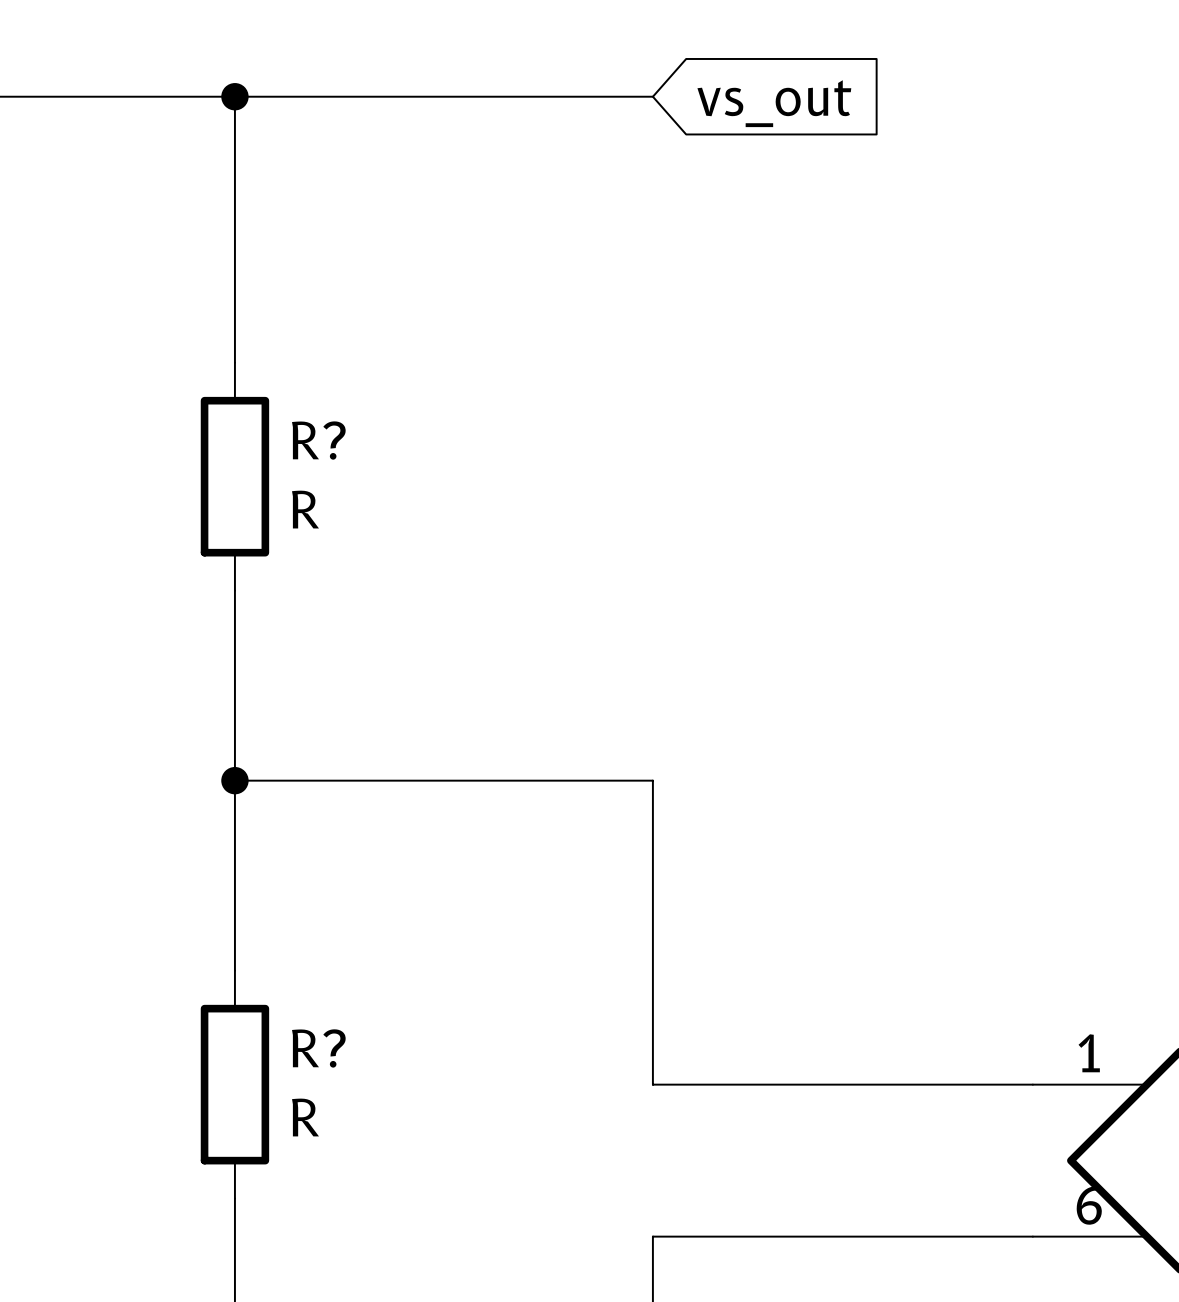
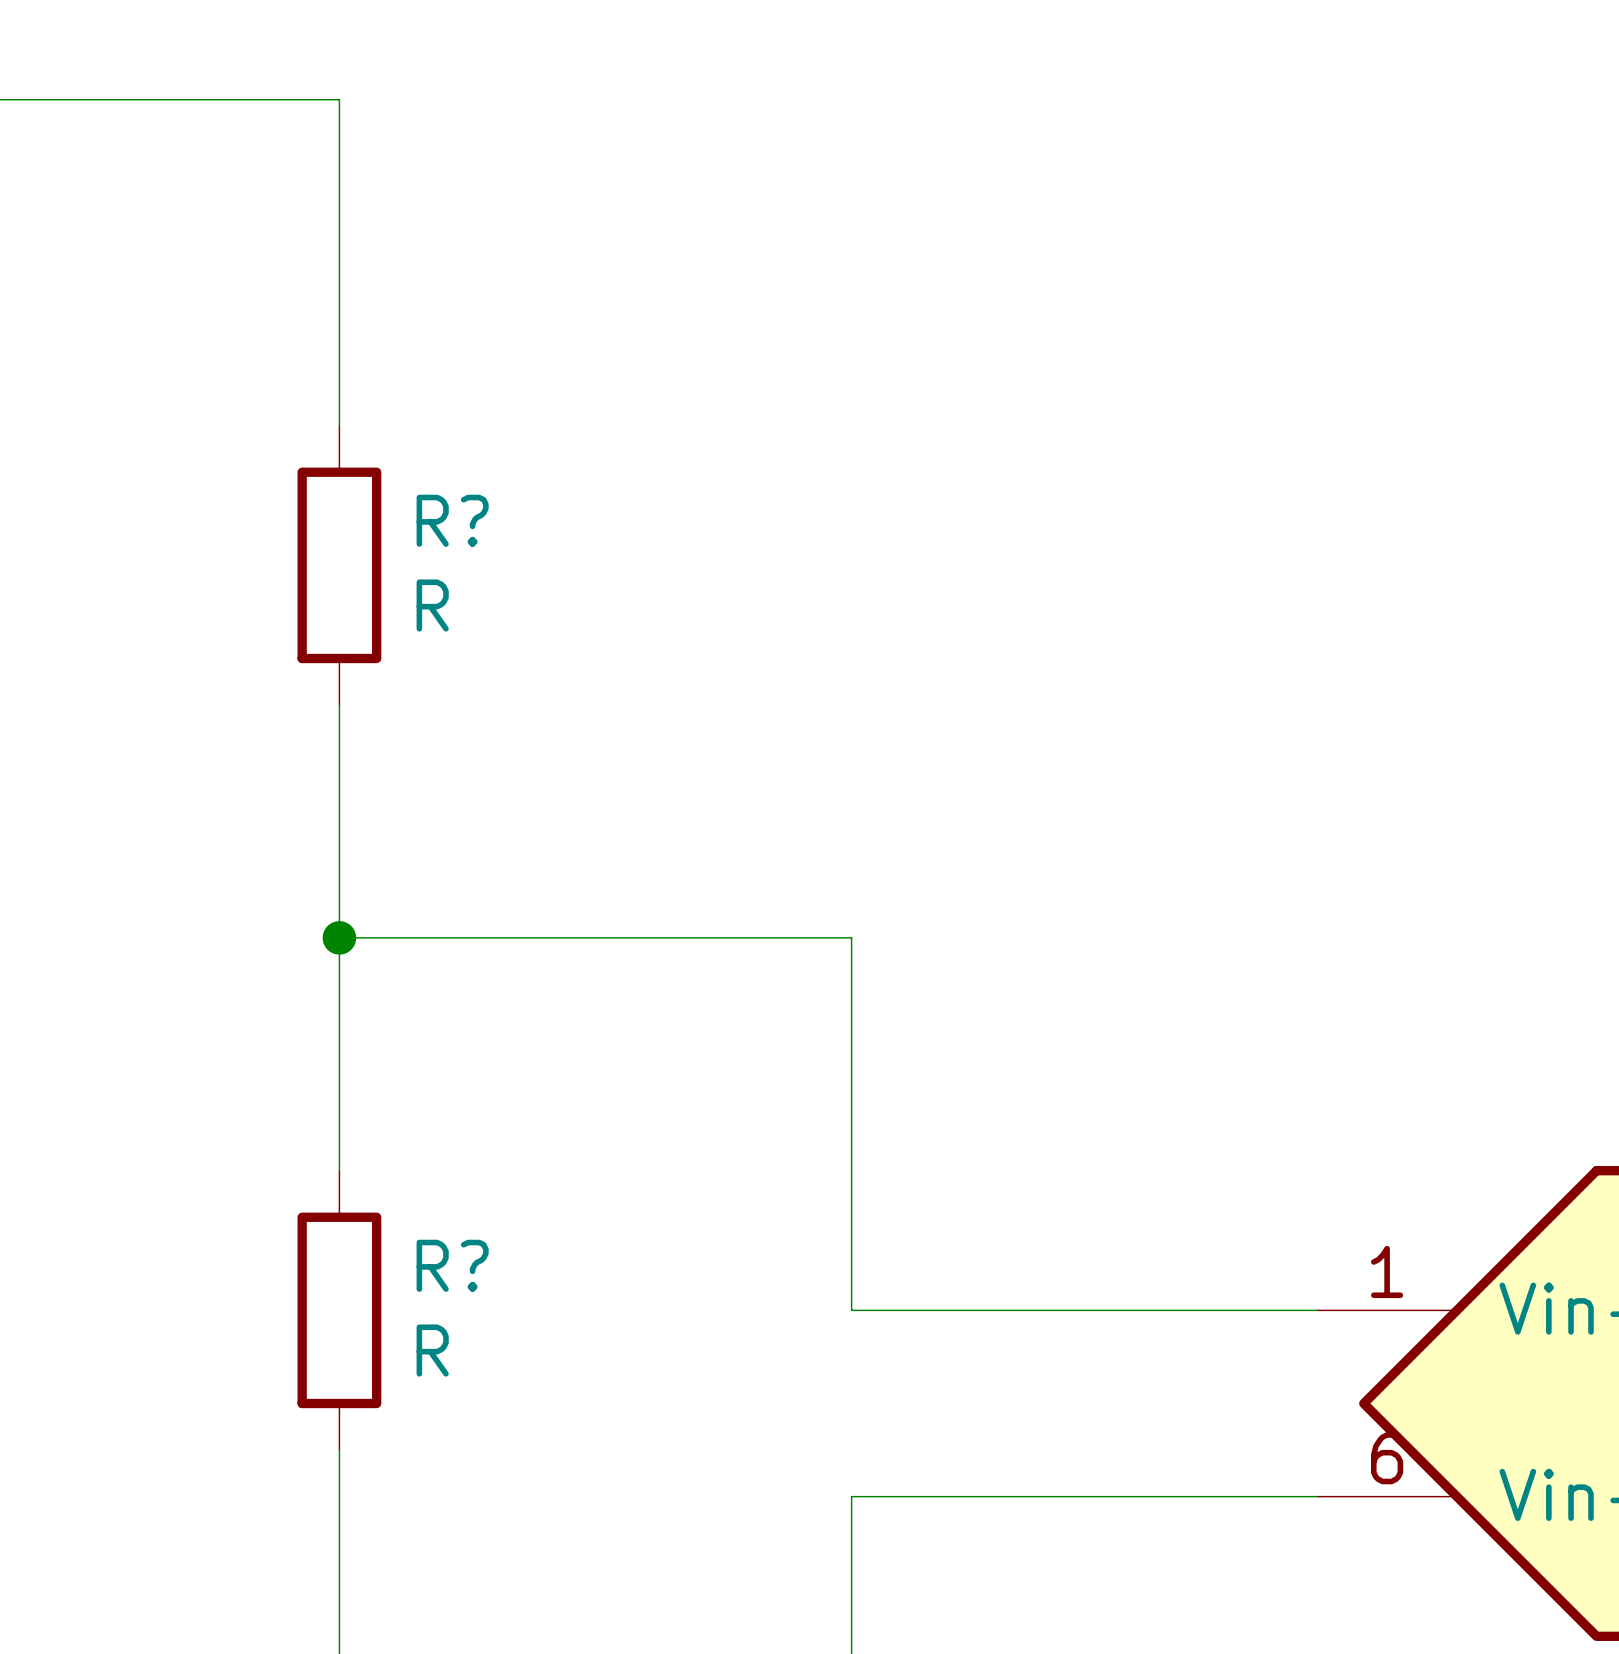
wire: (234, 96) (652, 96) -> none
junction: (234, 96) -> none
global label: vs_out (774, 103) -> none

